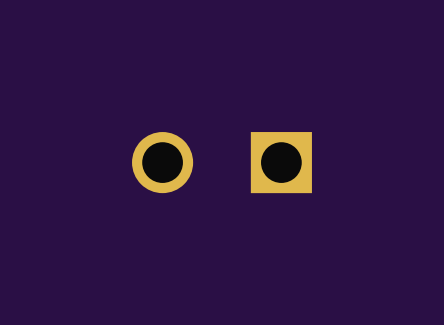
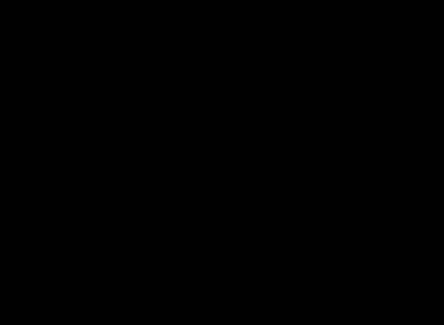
part: (221, 162) -> none

